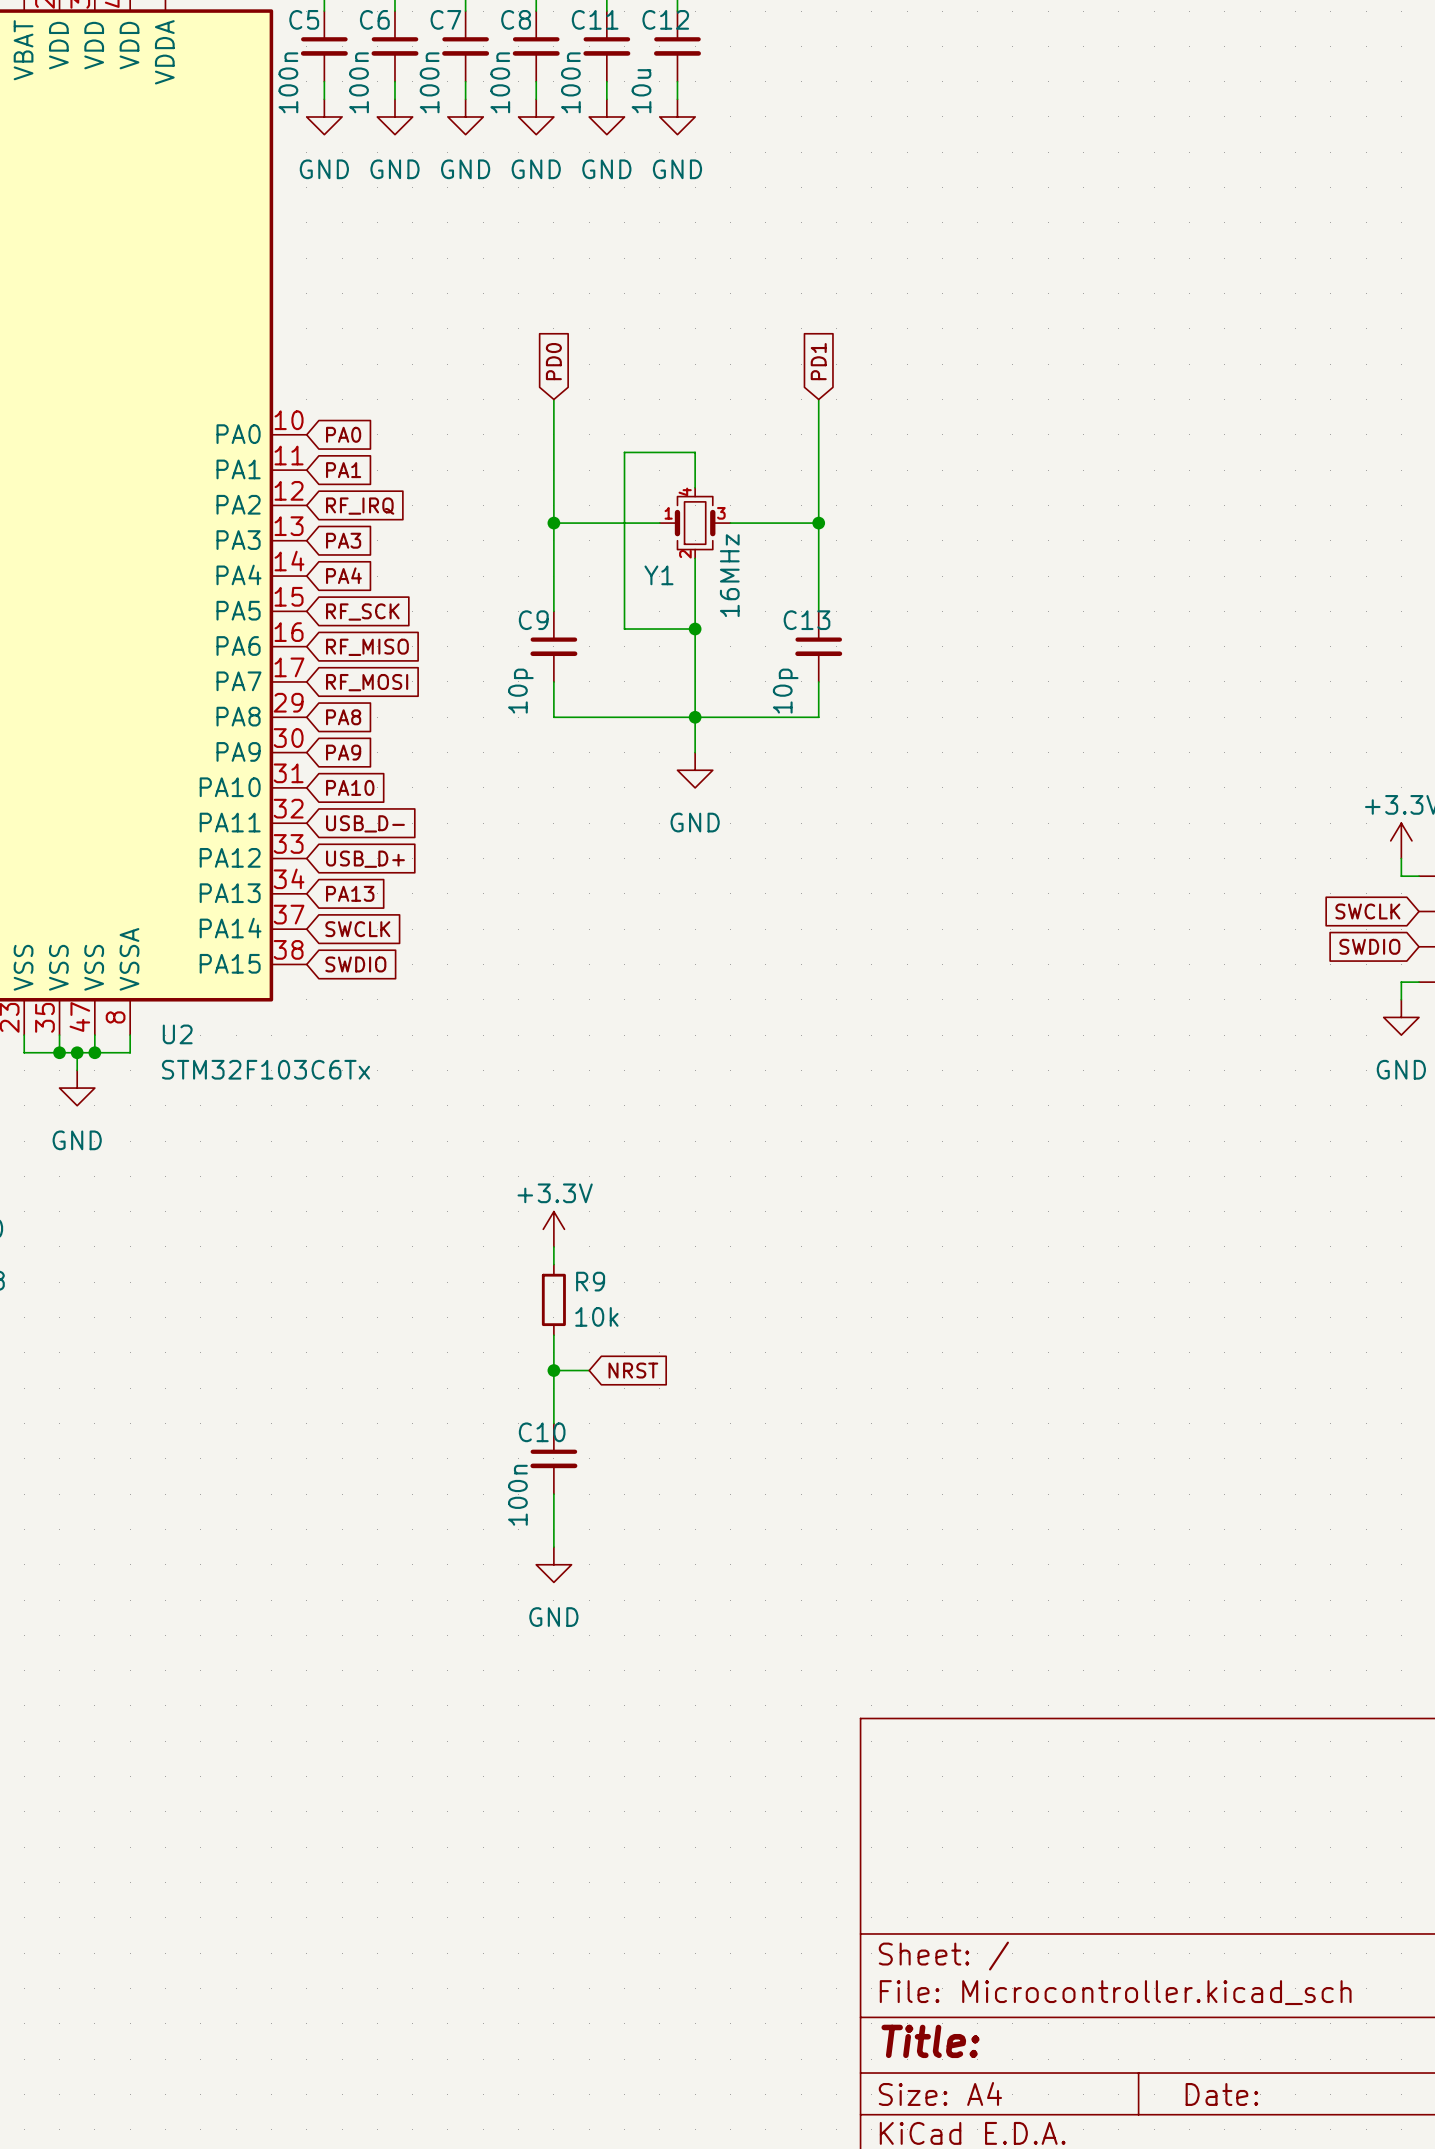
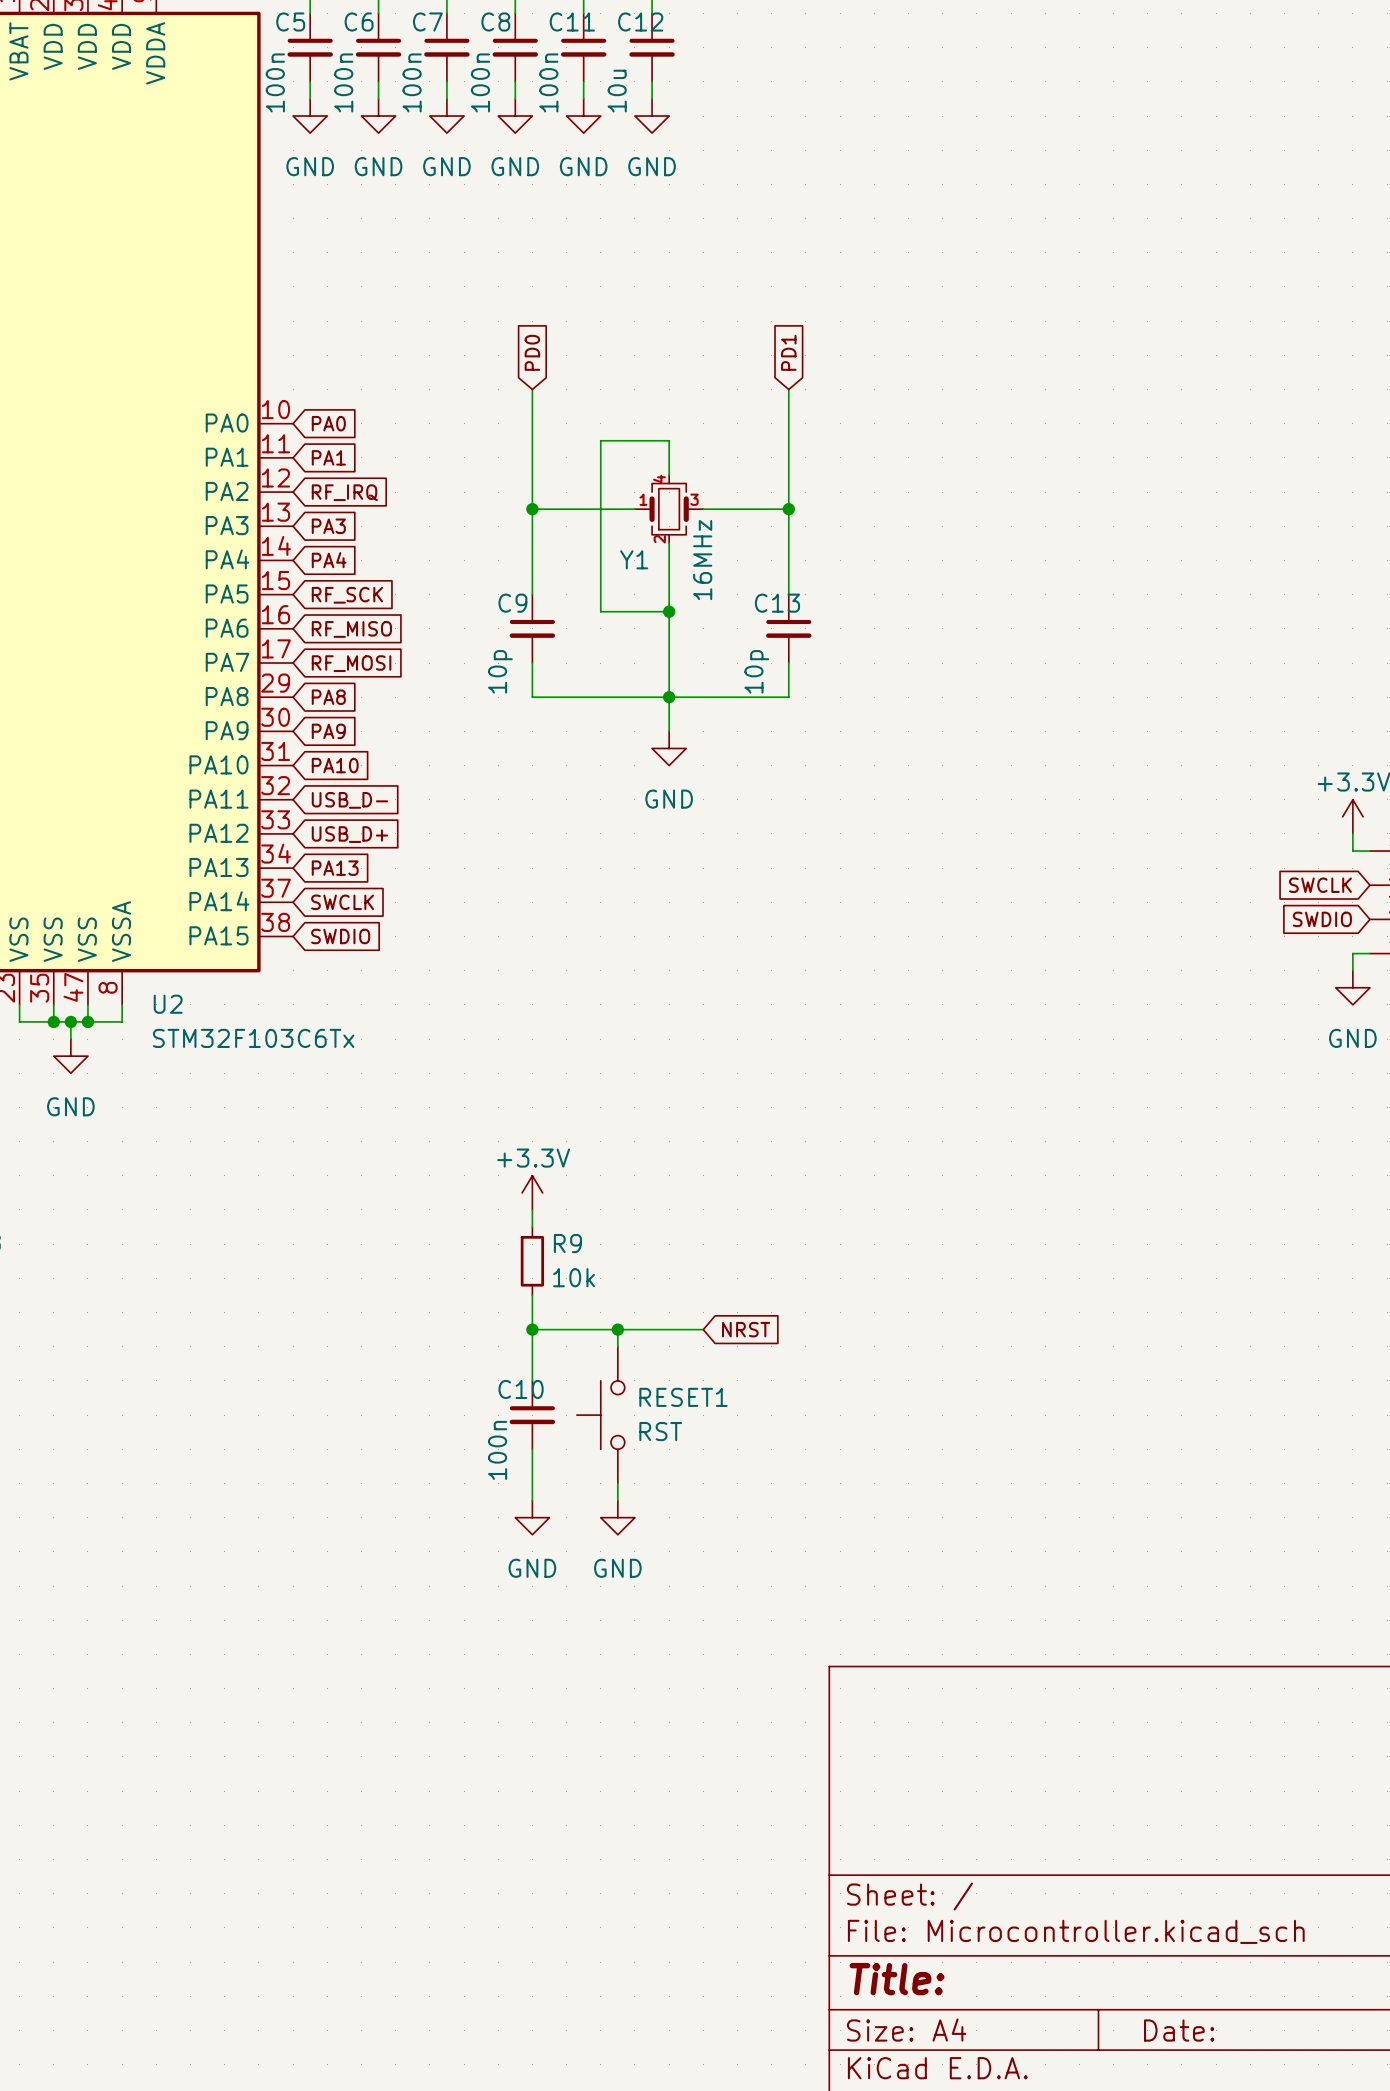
wire: none -> (566, 1329) (703, 1329)
global label position: NRST (633, 1370) -> NRST (746, 1329)
wire: none -> (617, 1329) (617, 1346)
junction: none -> (617, 1329)
RESET1: none -> RST (600, 1415)
wire: none -> (617, 1483) (617, 1500)
power symbol: none -> GND (617, 1517)

